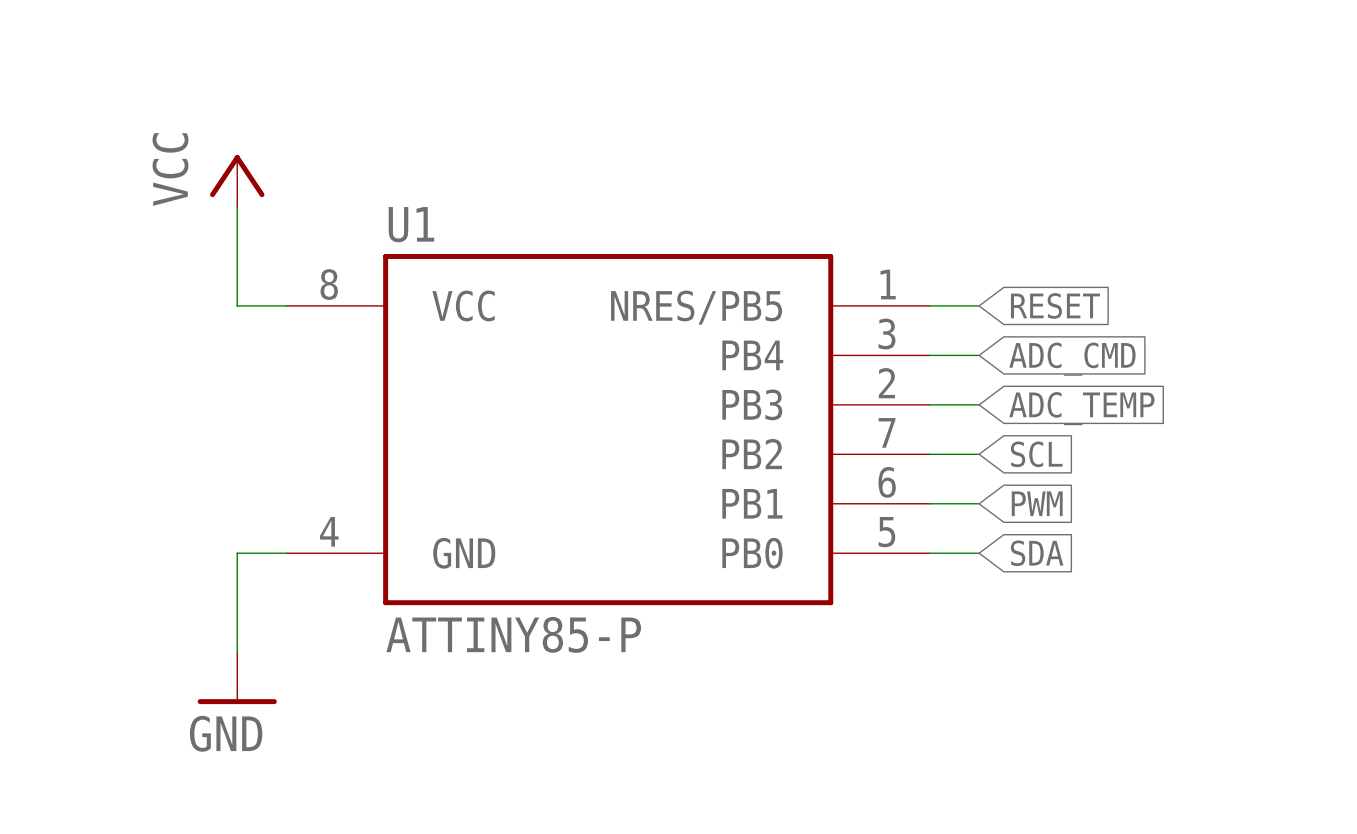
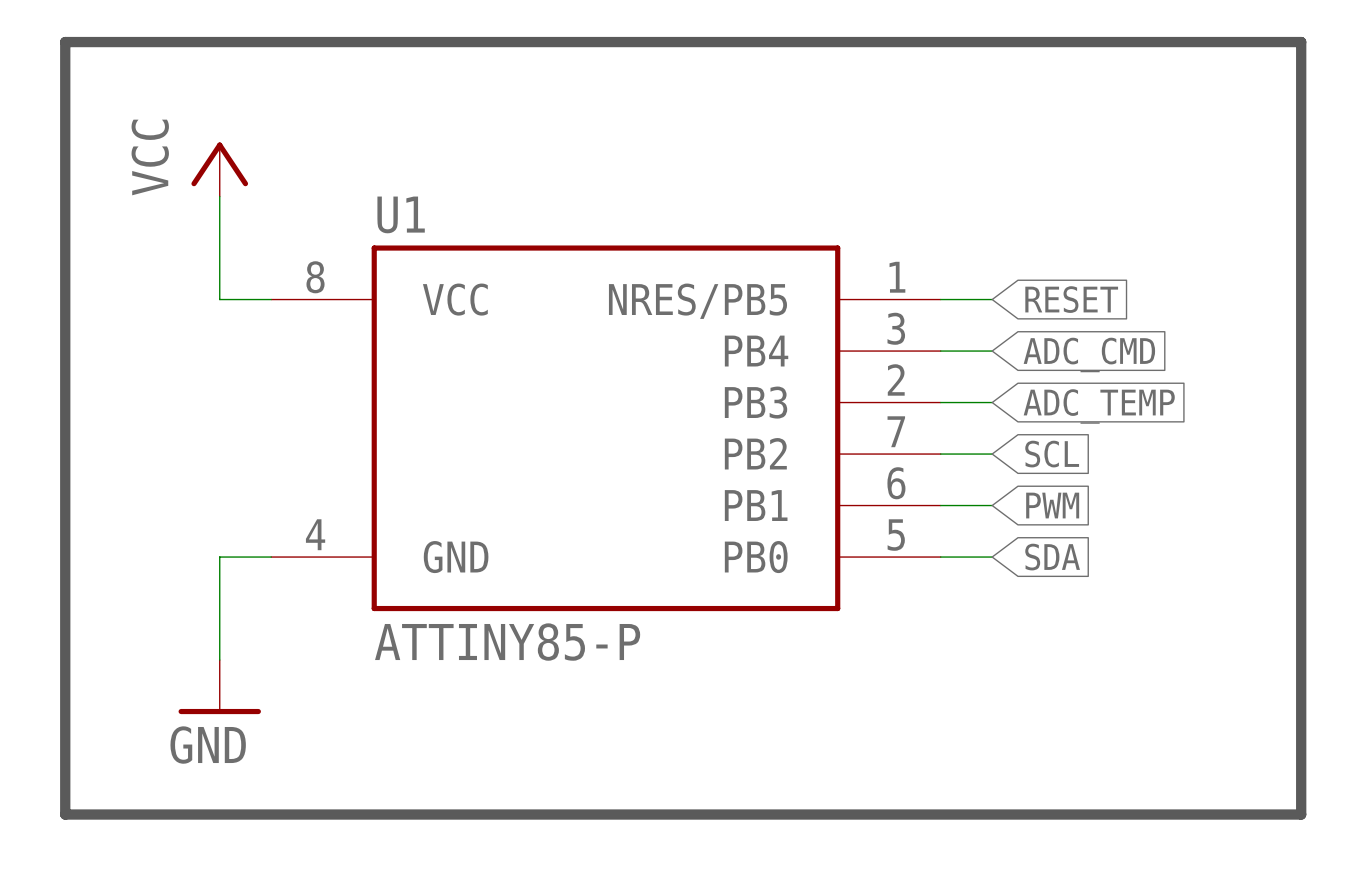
line: none -> (65, 42) (1301, 42) (1301, 814) (65, 814) (65, 42)

